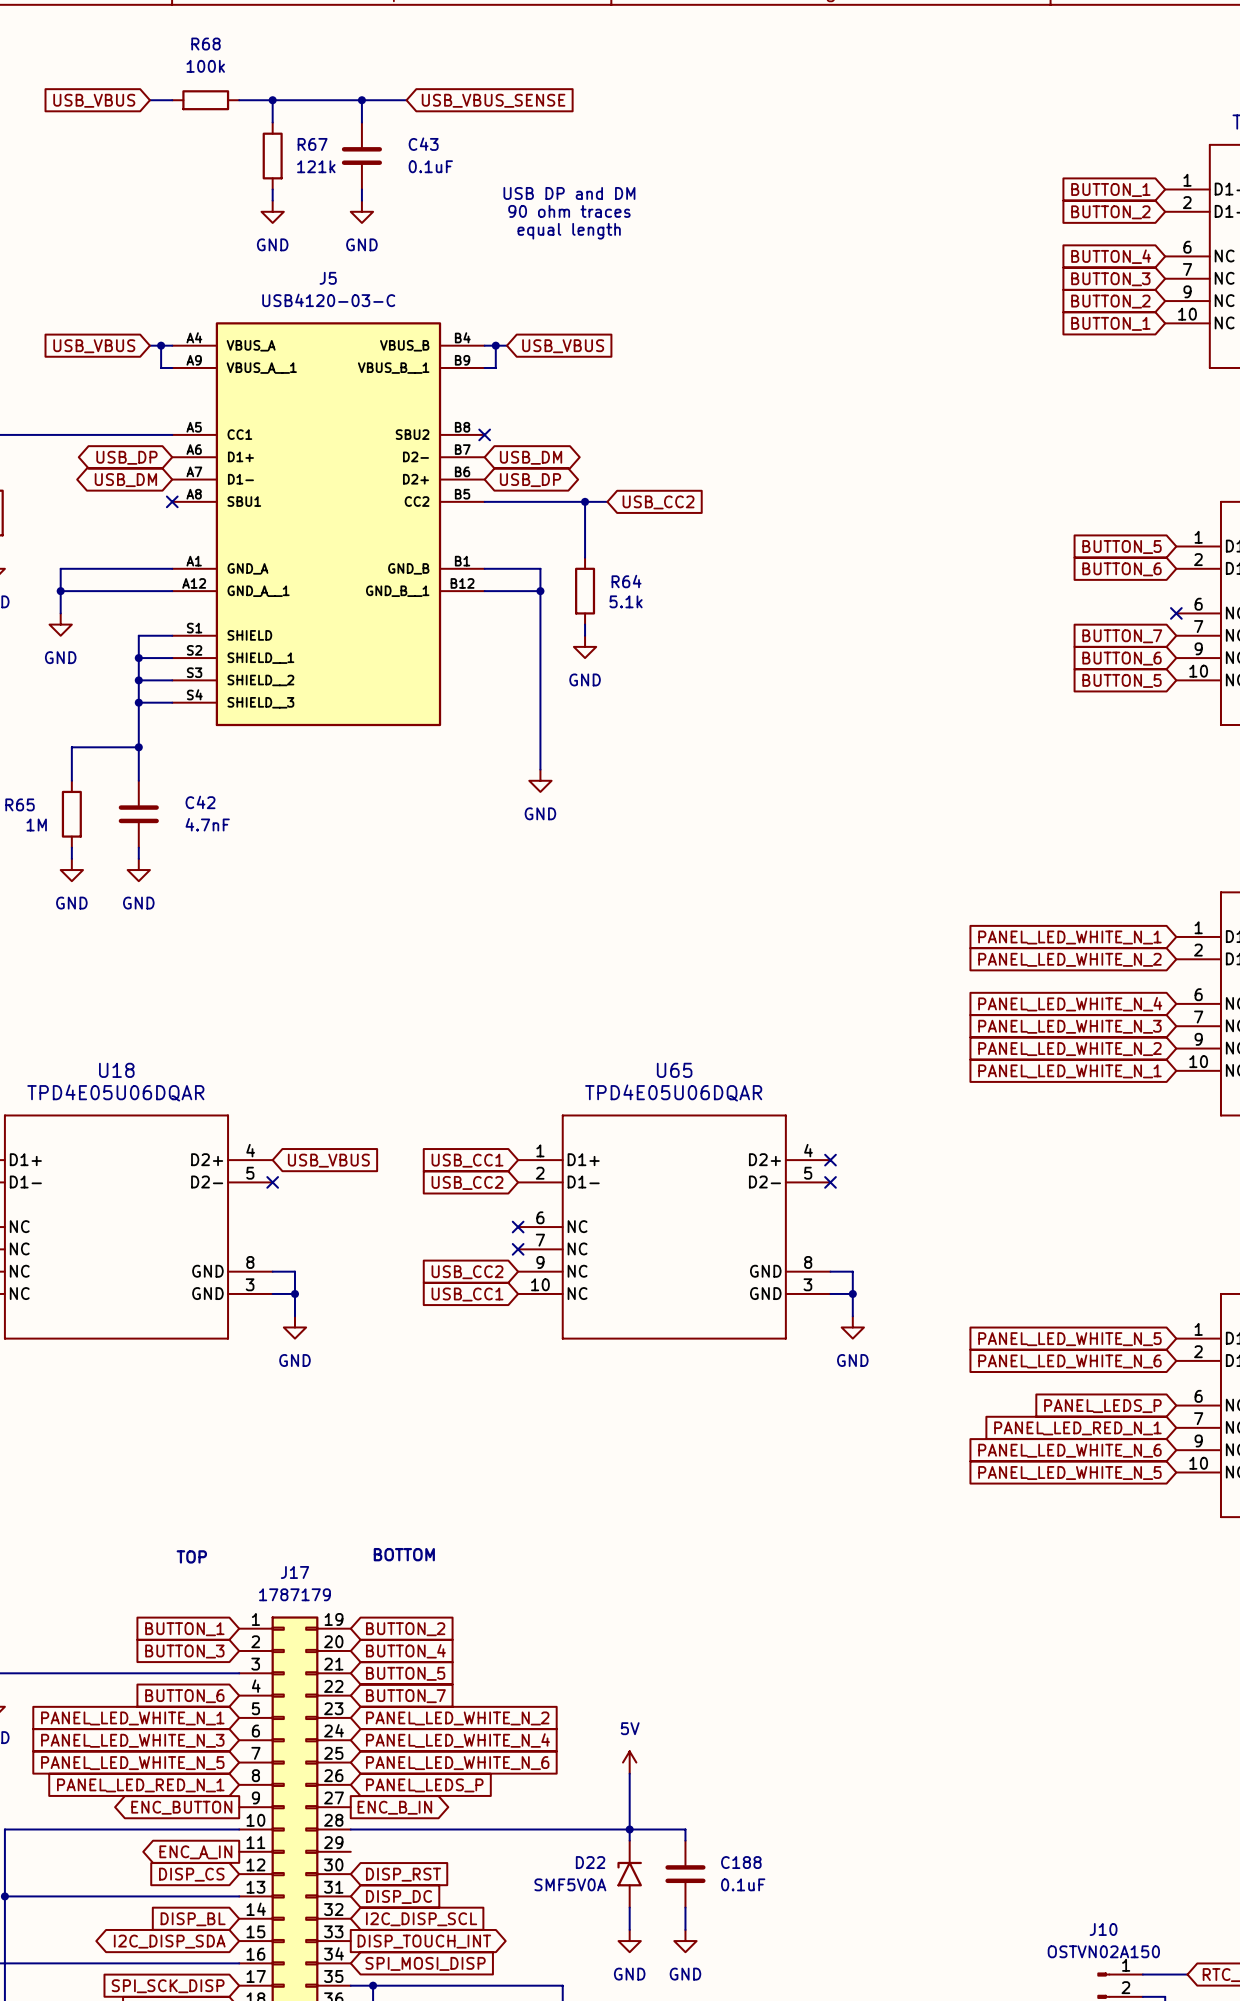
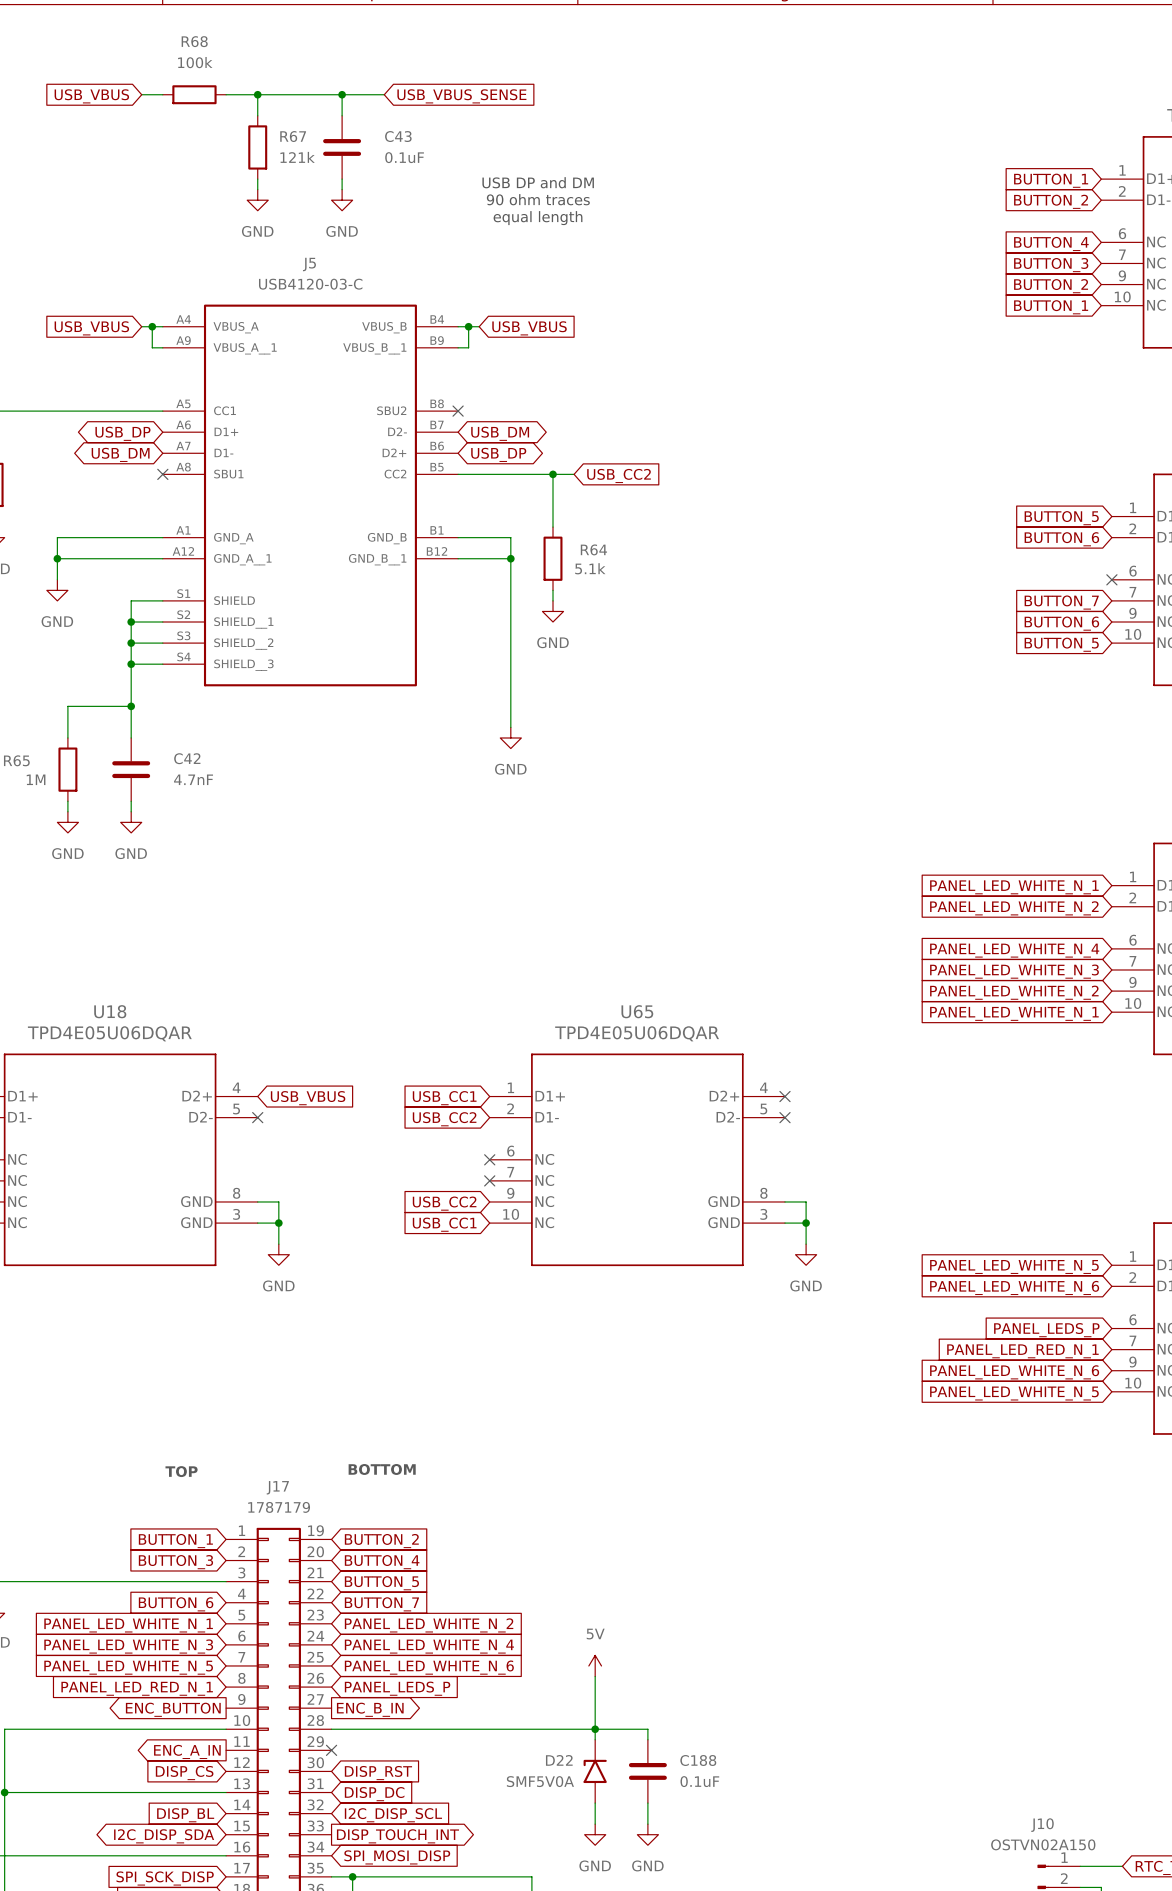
no-connect mark: none -> (331, 1750)

